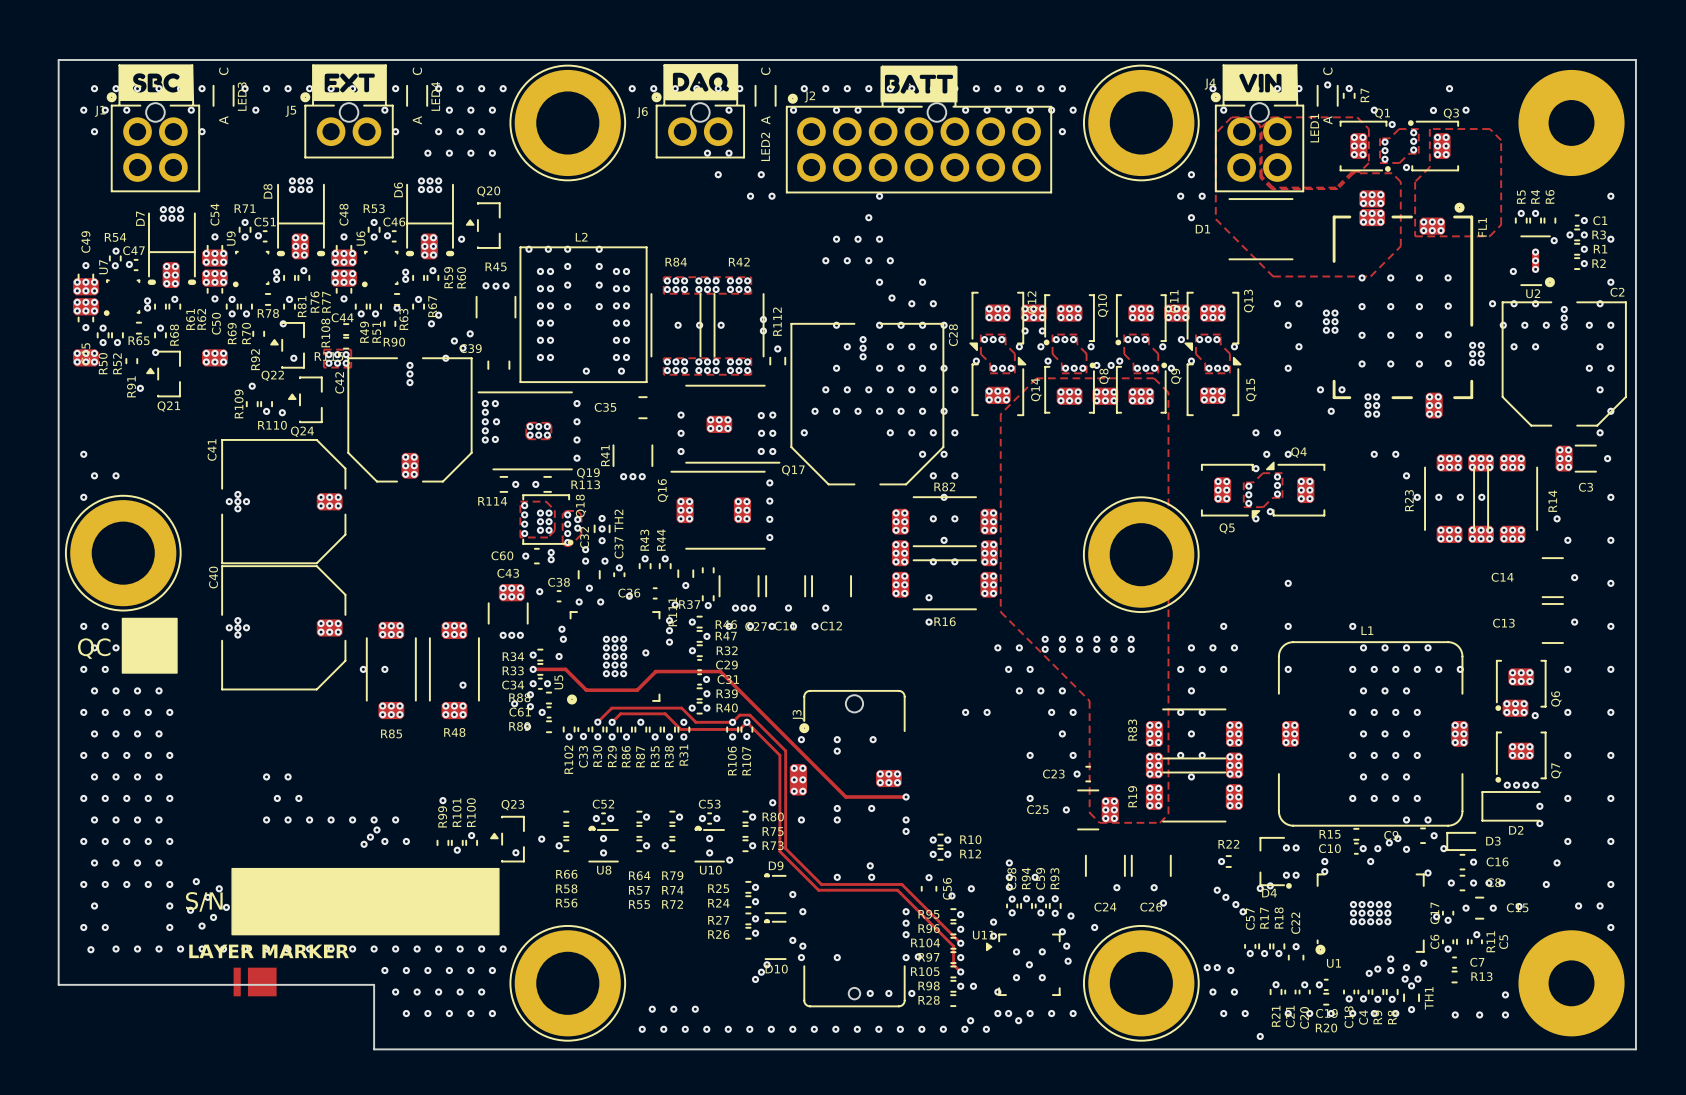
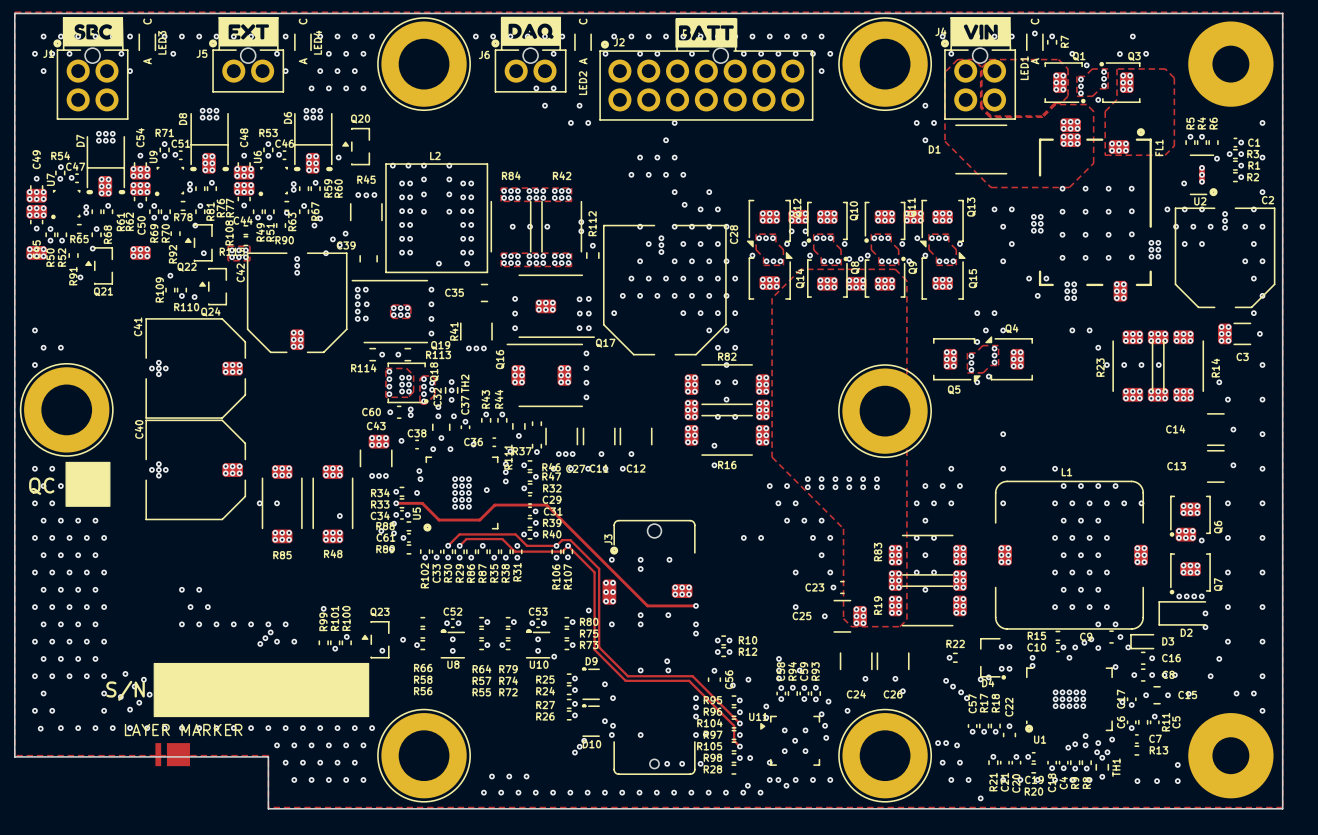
zone outline: none -> (14, 12) (14, 755) (268, 755) (268, 807) (1282, 807) (1282, 12) (14, 12)

